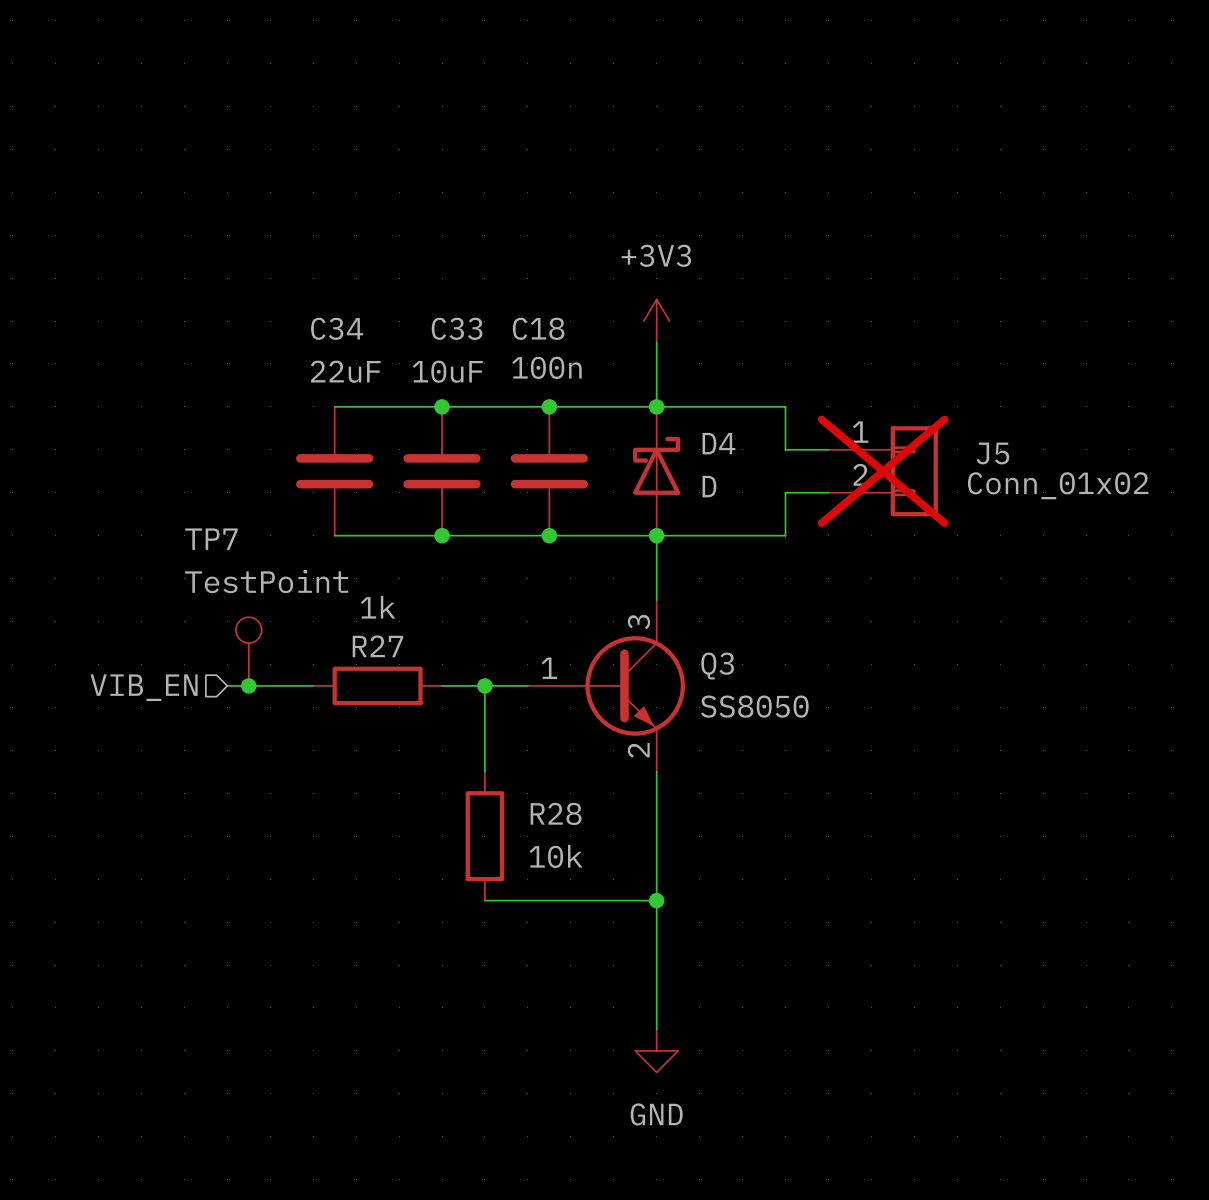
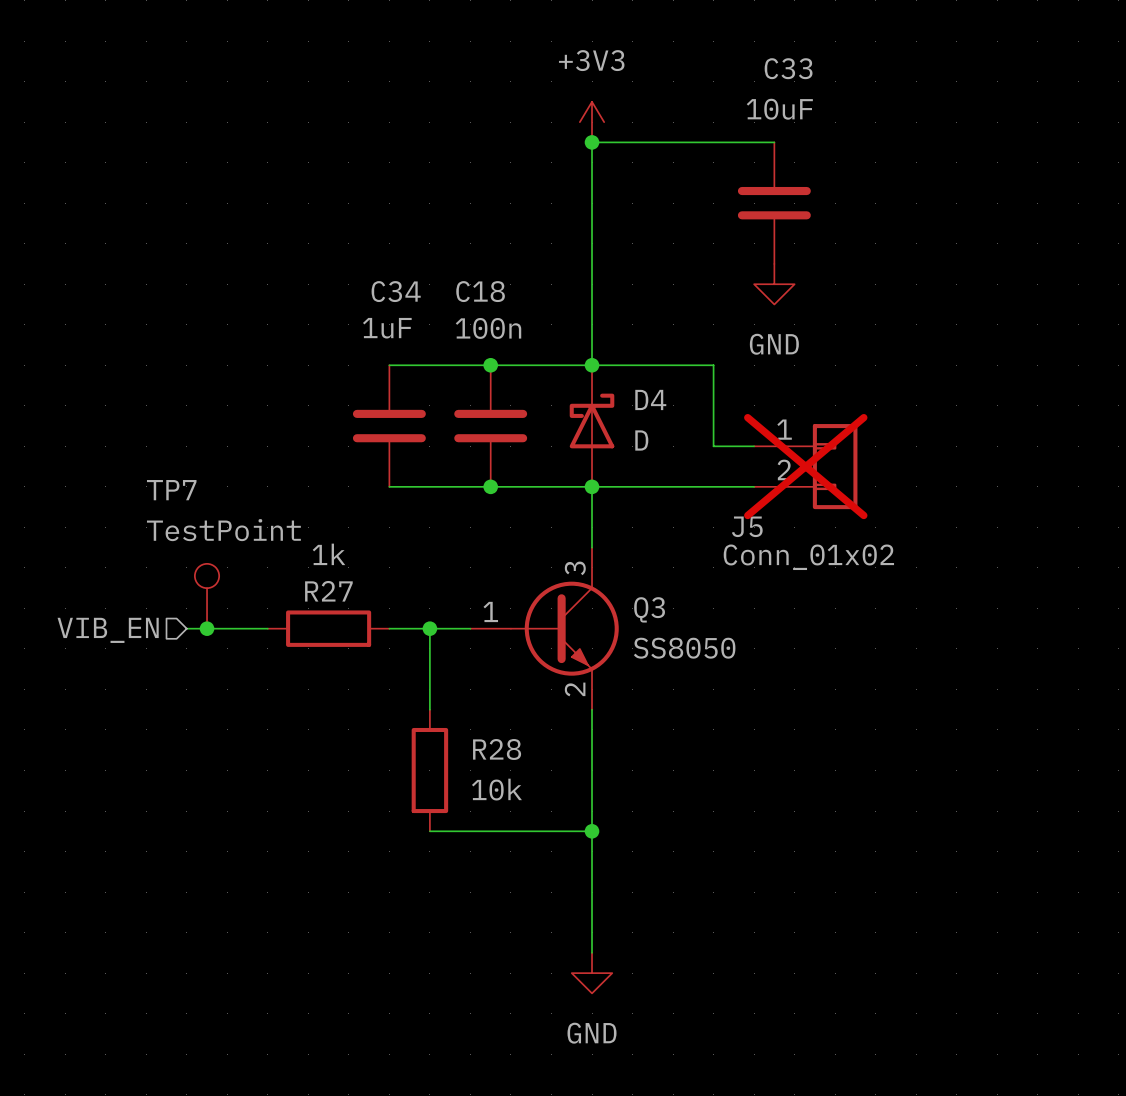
junction: none -> (592, 142)
wire: none -> (774, 142) (592, 142) (592, 304)
C33: none -> 10uF (774, 203)
power symbol position: +3V3 (656, 321) -> +3V3 (592, 122)
power symbol: none -> GND (774, 284)
C33 name: C33 (457, 328) -> C34 (396, 291)
C33 value: 10uF (447, 371) -> 1uF (387, 328)
wire: (334, 406) (442, 406) -> none
junction: (442, 406) -> none
wire: (785, 449) (828, 449) -> (713, 405) (713, 446)
J5 name position: J5 (992, 453) -> J5 (747, 526)
C34: 22uF (334, 471) -> none
J5 position: (883, 471) -> (805, 466)
J5 value position: Conn_01x02 (1058, 485) -> Conn_01x02 (808, 557)
wire: (785, 492) (785, 535) -> (754, 486) (713, 486)
wire: (334, 535) (442, 535) -> none
junction: (442, 535) -> none

